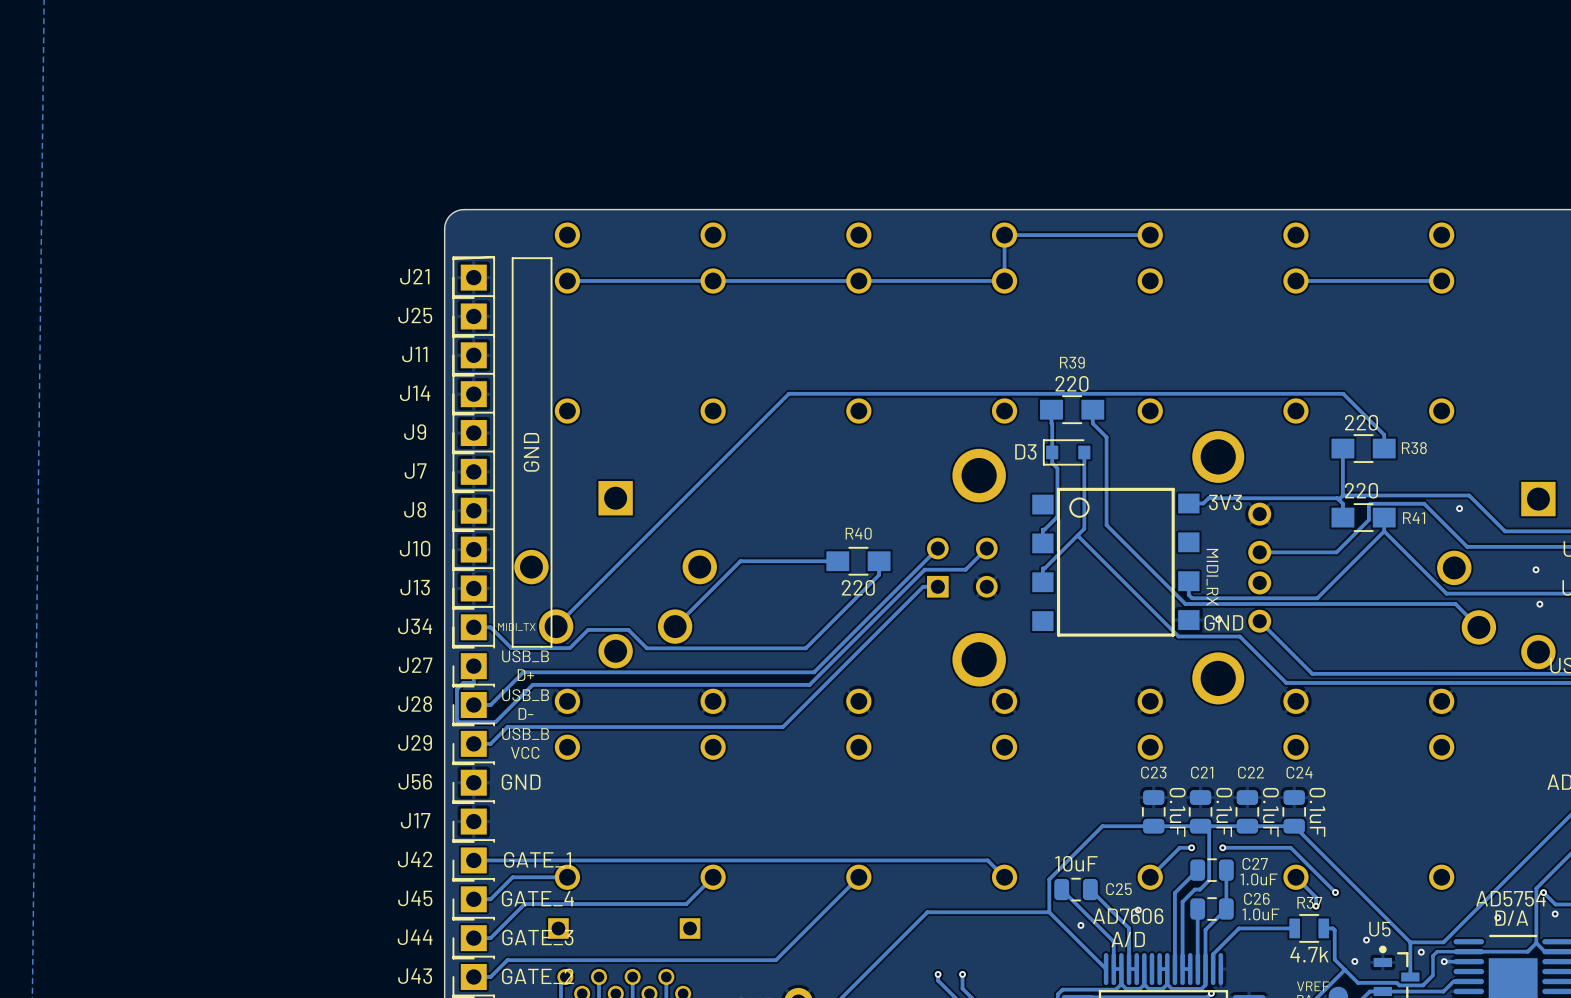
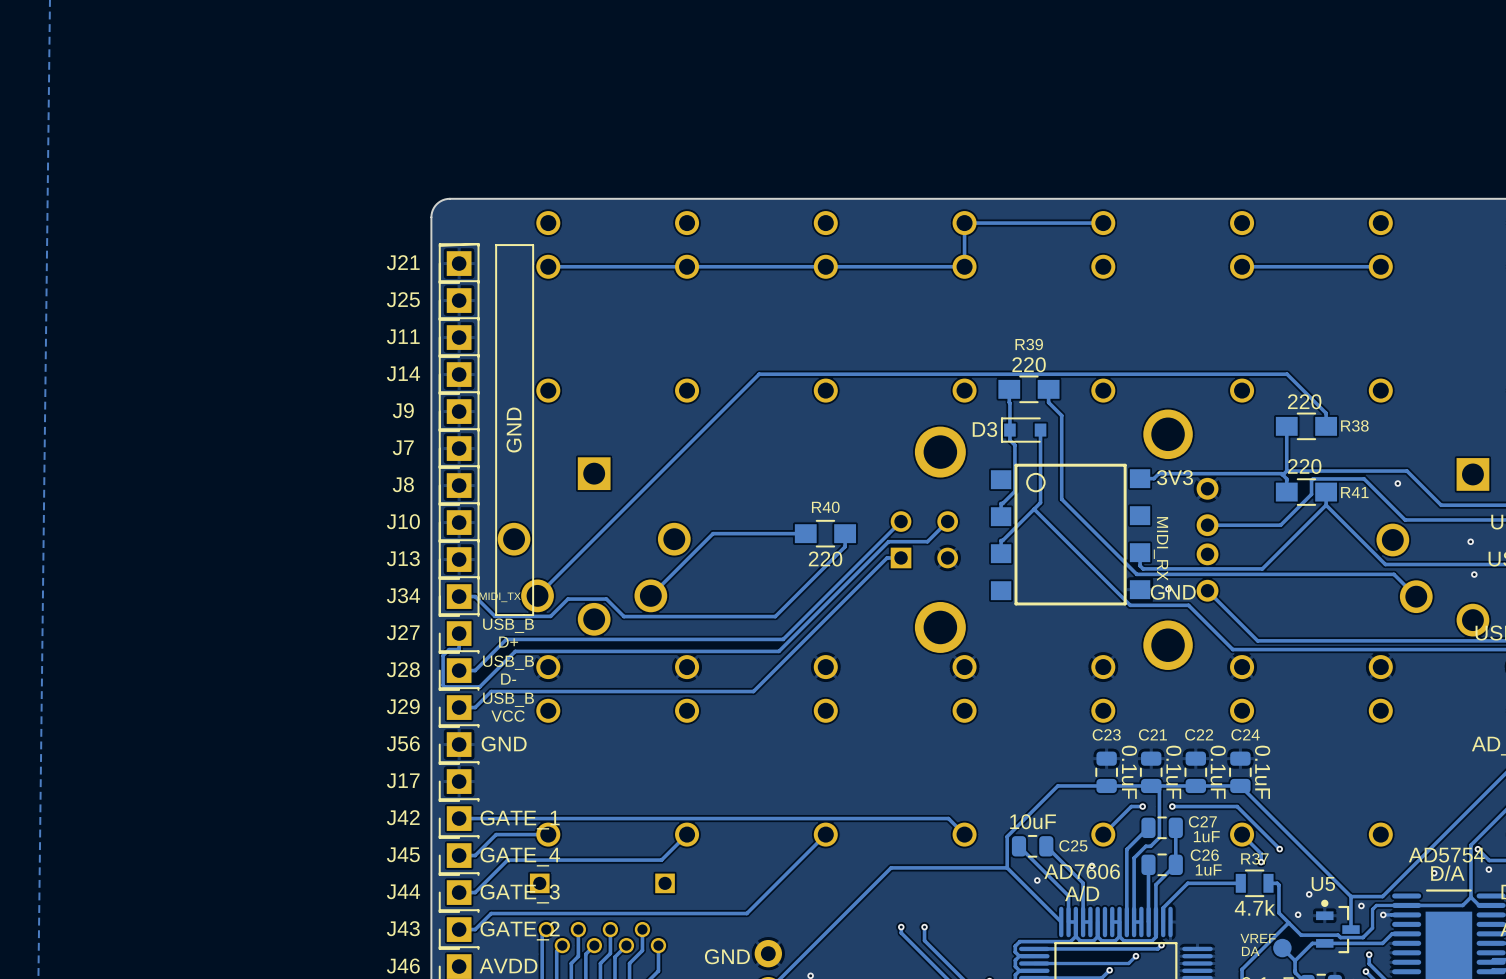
C27 value: 1.0uF (1258, 879) -> 1uF (1206, 836)
C26 value: 1.0uF (1260, 914) -> 1uF (1208, 870)

